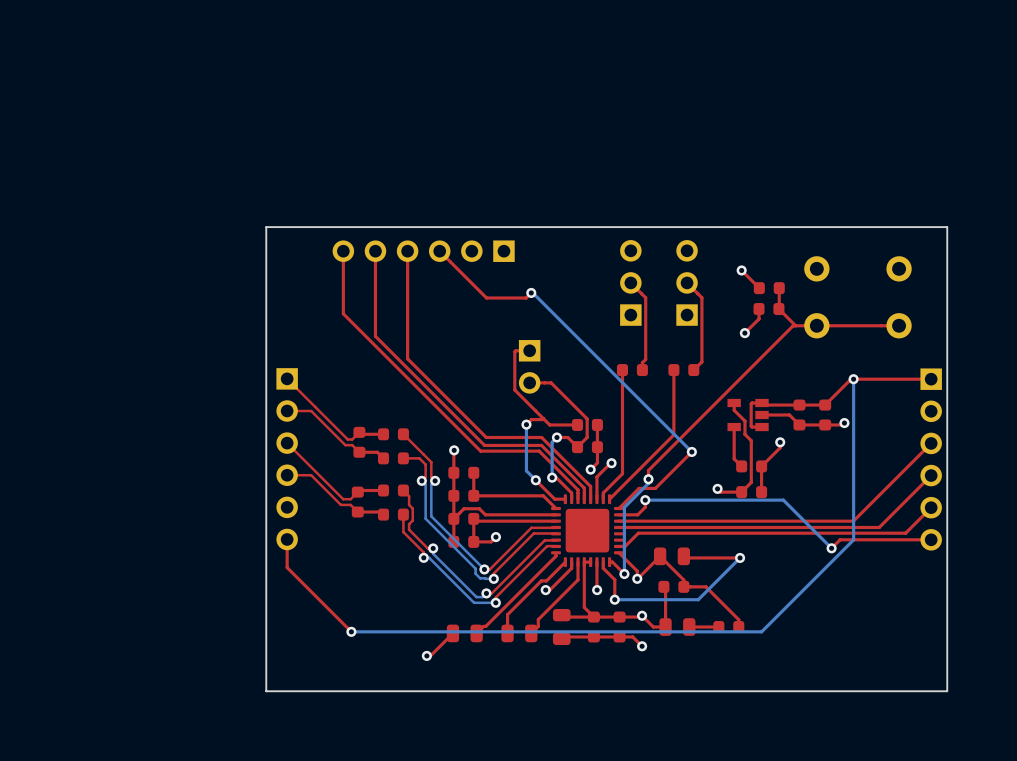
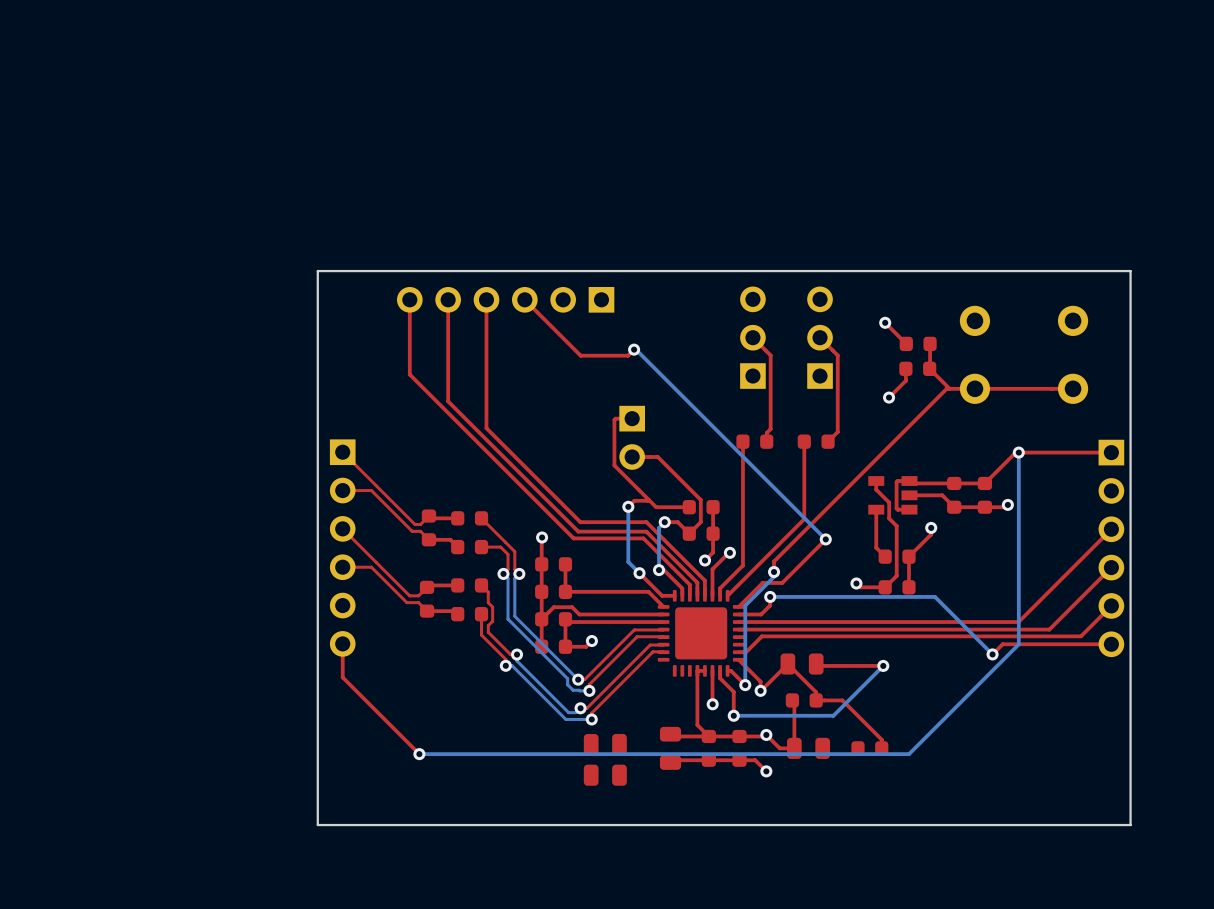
top track: (556, 552) (556, 556) (476, 633) -> none
top track: (565, 562) (546, 580) (541, 580) (507, 614) (507, 633) -> none
top track: (571, 562) (571, 568) (549, 590) (545, 590) -> none
top track: (578, 562) (578, 579) (538, 619) (538, 626) (531, 633) -> none
via: (545, 590) -> none
part: none -> (605, 744)
top track: (718, 627) (689, 627) -> none
top track: (452, 633) (430, 655) (426, 655) -> none
part: (464, 633) -> none
part: (519, 633) -> none
part: none -> (605, 775)
via: (426, 655) -> none

